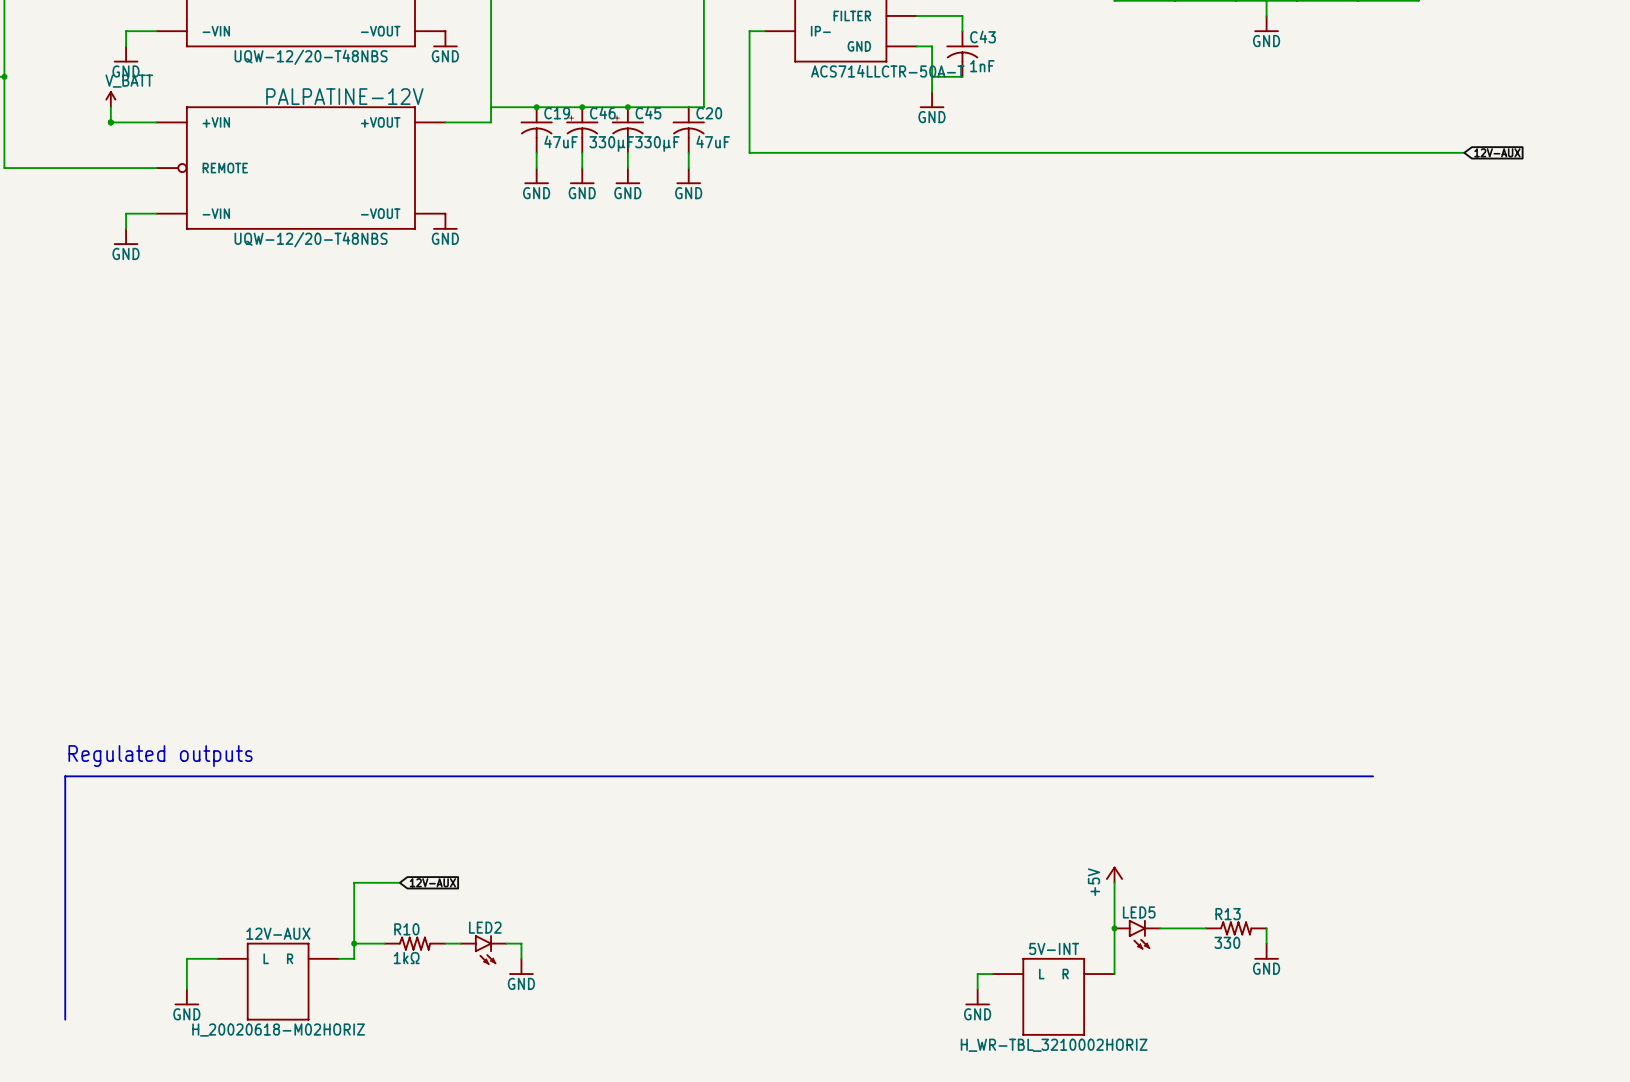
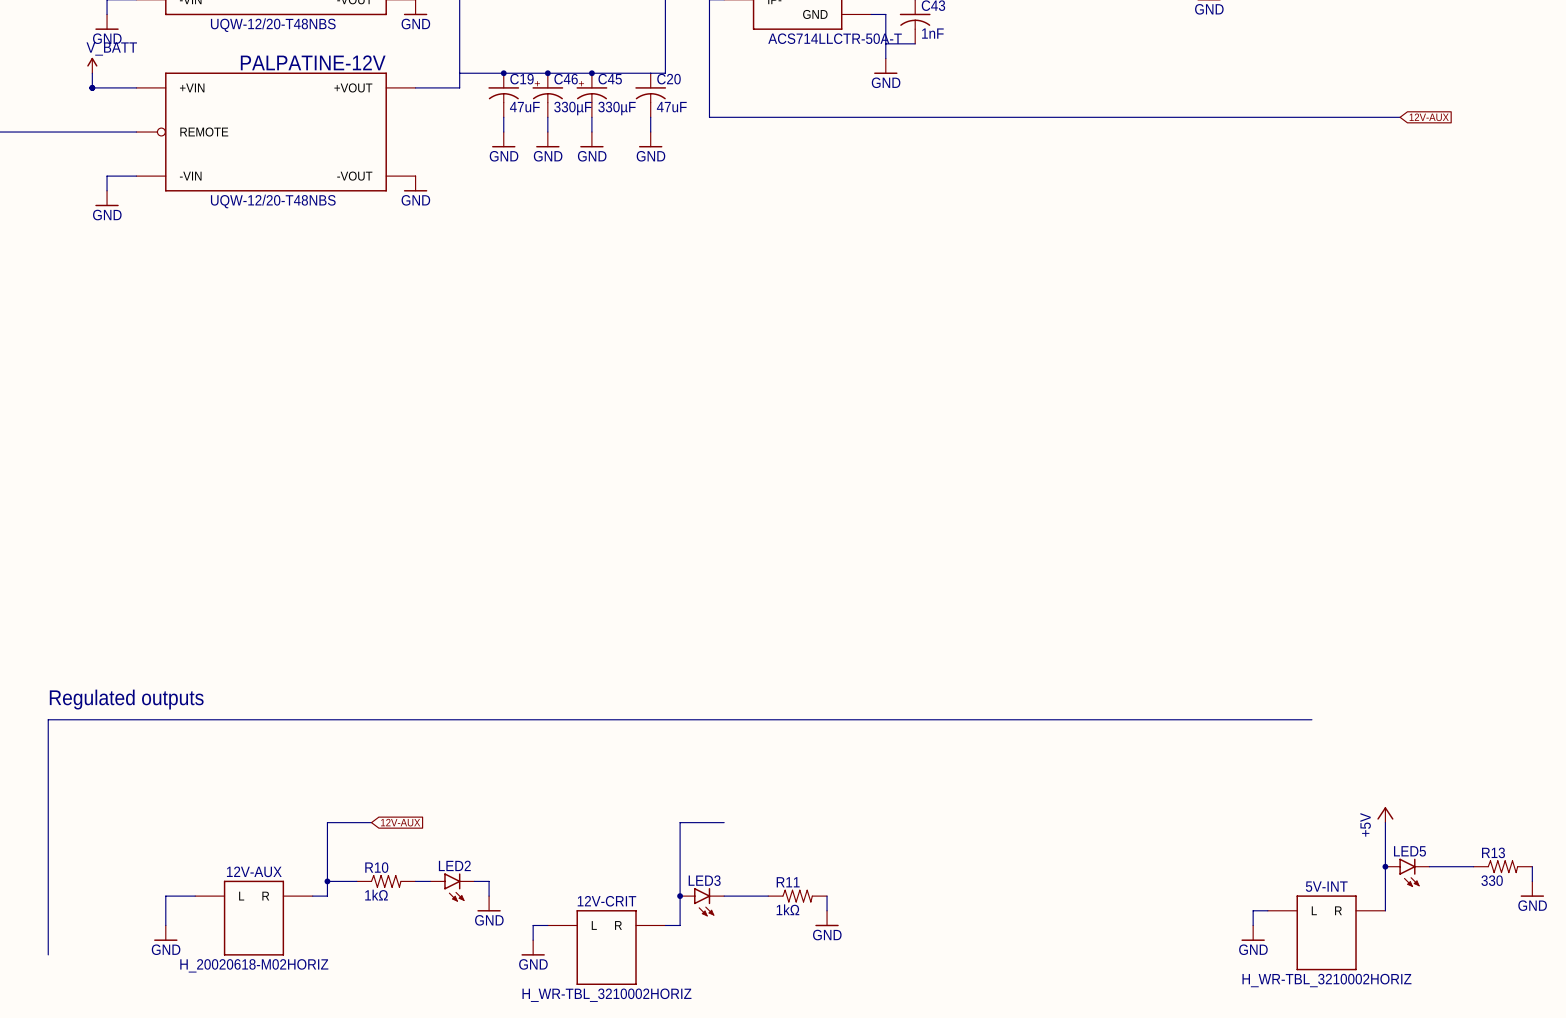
power symbol: +5V (1114, 874) -> none
power symbol: none -> +5V (1385, 814)
wire: none -> (724, 822) (680, 822) (680, 925) (665, 925)
wire: (1114, 882) (1114, 974) -> none
wire: none -> (1385, 822) (1385, 910)
junction: (1114, 928) -> none
wire: (1160, 928) (1205, 928) -> none
R13 position: (1236, 928) -> (1502, 866)
wire: (1266, 928) (1266, 943) -> none
junction: none -> (1385, 866)
wire: none -> (1429, 866) (1473, 866)
wire: none -> (1532, 866) (1532, 881)
LED5 position: (1137, 934) -> (1407, 872)
power symbol position: GND (1266, 951) -> GND (1253, 933)
power symbol: none -> GND (1532, 889)
junction: none -> (680, 896)
wire: none -> (724, 896) (768, 896)
R11: none -> 1kΩ (797, 896)
wire: none -> (827, 896) (827, 910)
LED3: none -> (702, 902)
wire: (992, 974) (977, 974) (977, 989) -> none
wire: none -> (1267, 910) (1253, 910) (1253, 925)
wire: none -> (547, 925) (533, 925) (533, 940)
5V-INT position: (1053, 996) -> (1326, 932)
power symbol position: GND (977, 997) -> GND (827, 918)
power symbol: none -> GND (533, 947)
12V-CRIT: none -> H_WR-TBL_3210002HORIZ (606, 947)

